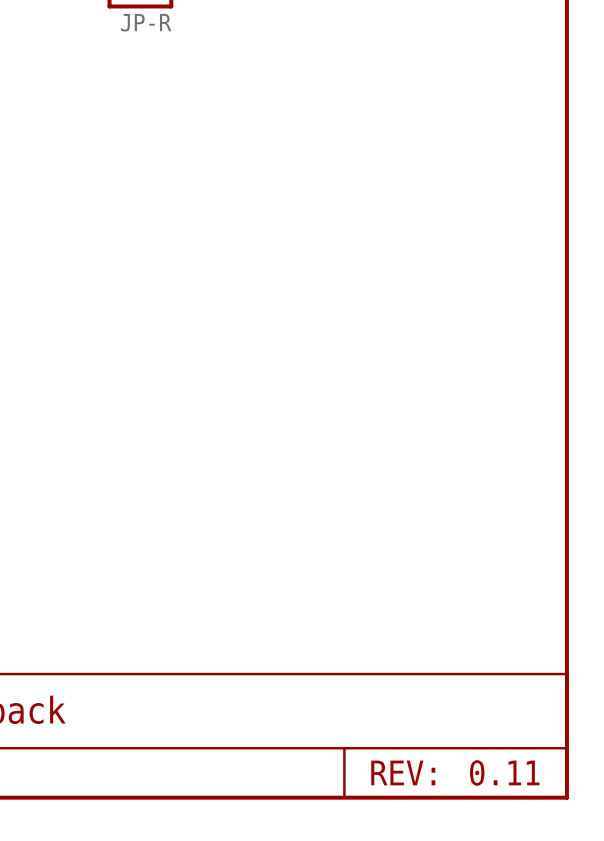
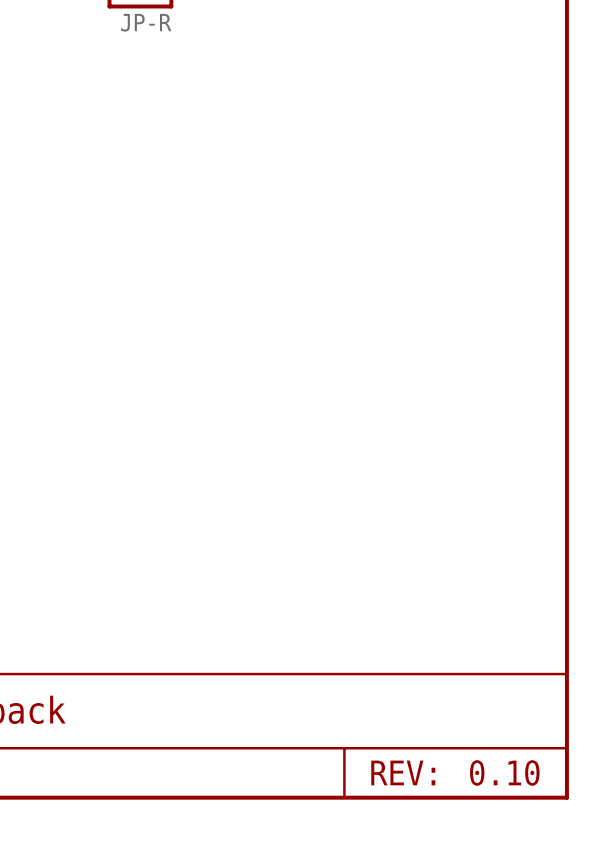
text: 0.11 (504, 772) -> 0.10 (504, 772)

